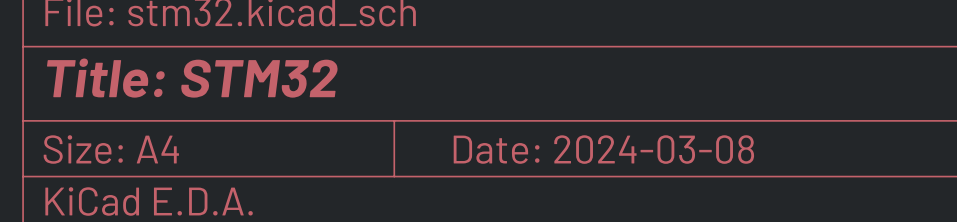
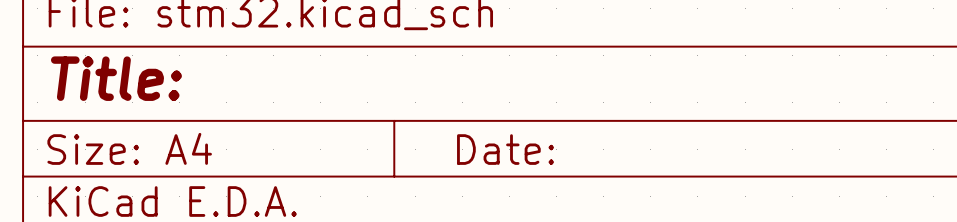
title block: Title: STM32 (192, 78) -> Title: (116, 78)
title block: Date: 2024-03-08 (603, 149) -> Date: (505, 149)

